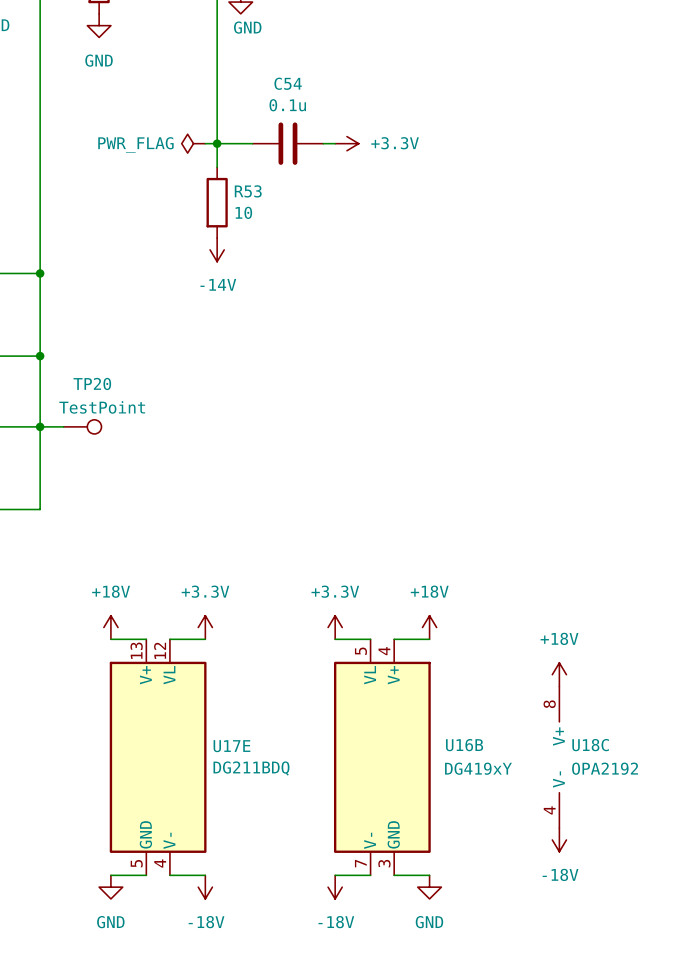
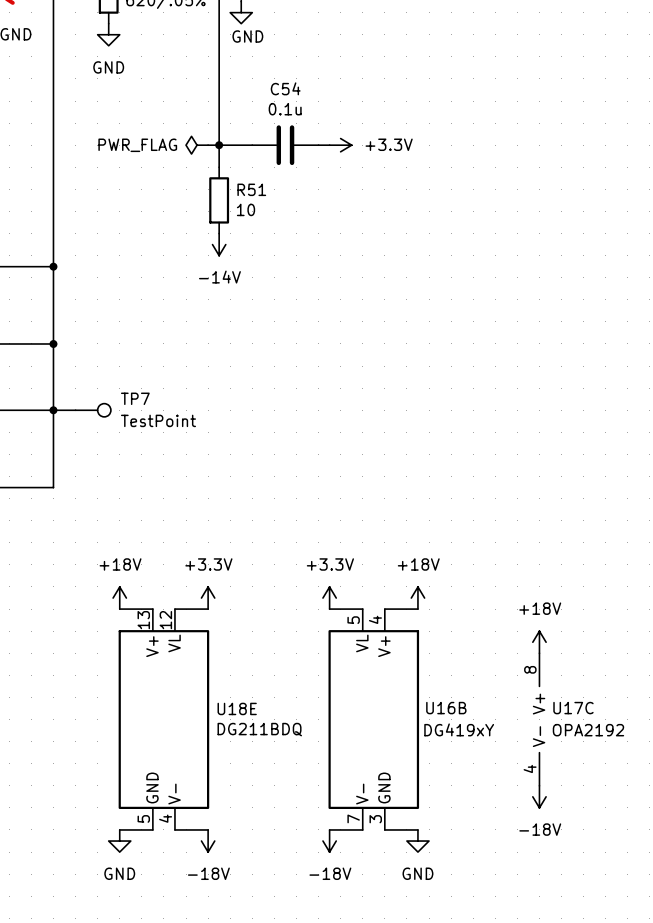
R53 name: R53 (248, 191) -> R51 (251, 189)
TP20 name: TP20 (92, 383) -> TP7 (135, 398)
TP20 value position: TestPoint (102, 407) -> TestPoint (158, 420)
U18C name: U18C (590, 745) -> U17C (573, 708)
U17E name: U17E (231, 746) -> U18E (237, 708)

